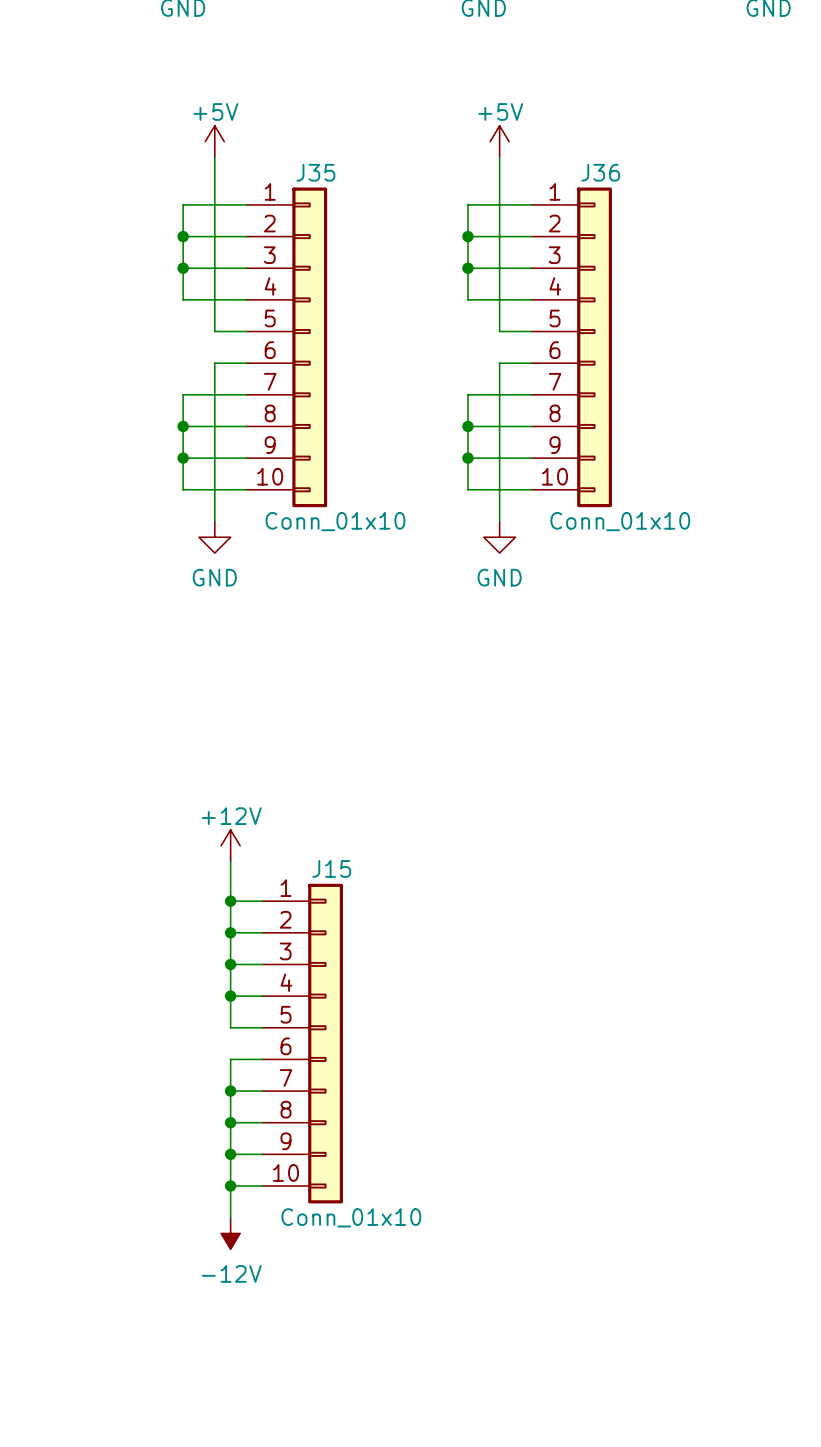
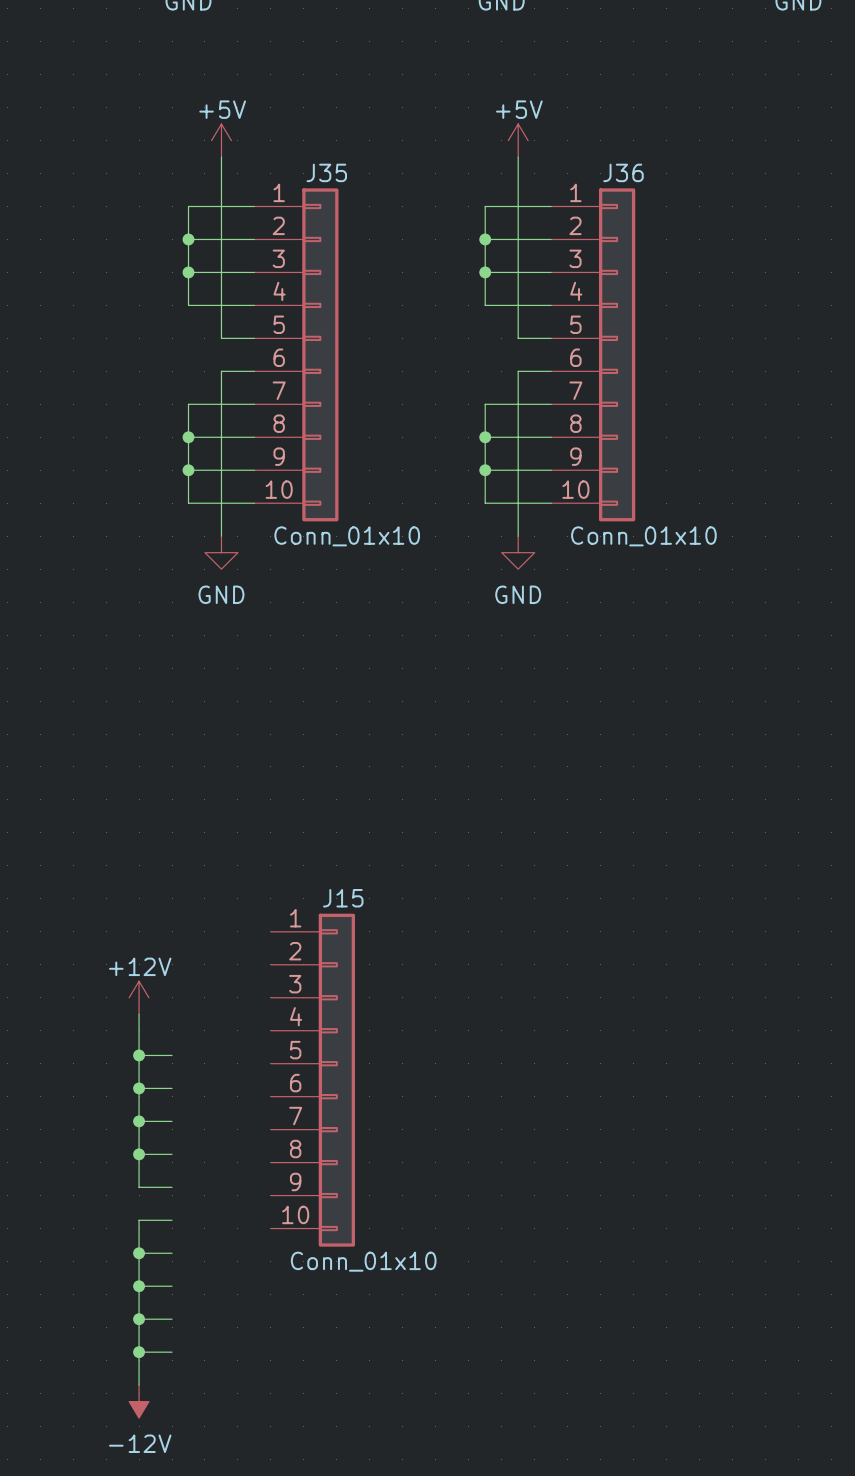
power symbol position: +12V (230, 845) -> +12V (139, 997)
wire: (230, 861) (230, 1027) (262, 1027) -> (139, 1014) (139, 1187) (172, 1187)
wire: (230, 901) (262, 901) -> (139, 1055) (172, 1055)
junction: (230, 901) -> none
wire: (230, 932) (262, 932) -> (139, 1088) (172, 1088)
junction: (230, 932) -> none
wire: (230, 964) (262, 964) -> (139, 1121) (172, 1121)
junction: (230, 964) -> none
wire: (230, 996) (262, 996) -> (139, 1154) (172, 1154)
junction: (230, 996) -> none
junction: none -> (139, 1055)
junction: none -> (139, 1088)
wire: (262, 1059) (230, 1059) (230, 1217) -> (172, 1220) (139, 1220) (139, 1385)
junction: none -> (139, 1121)
wire: (230, 1091) (262, 1091) -> (139, 1253) (172, 1253)
junction: (230, 1091) -> none
junction: none -> (139, 1154)
wire: (230, 1122) (262, 1122) -> (139, 1286) (172, 1286)
junction: (230, 1122) -> none
wire: (230, 1154) (262, 1154) -> (139, 1319) (172, 1319)
junction: (230, 1154) -> none
wire: (230, 1186) (262, 1186) -> (139, 1352) (172, 1352)
junction: (230, 1186) -> none
junction: none -> (139, 1253)
power symbol position: -12V (230, 1233) -> -12V (139, 1401)
junction: none -> (139, 1286)
junction: none -> (139, 1319)
junction: none -> (139, 1352)

